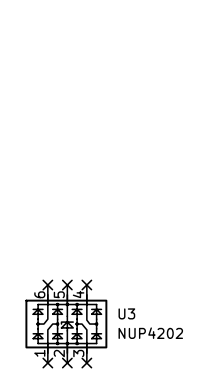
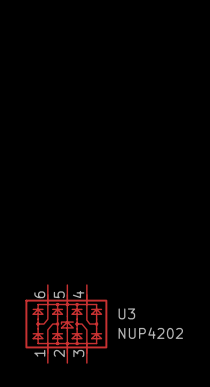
no-connect mark: (47, 285) -> none
no-connect mark: (67, 285) -> none
no-connect mark: (86, 285) -> none
no-connect mark: (47, 363) -> none
no-connect mark: (67, 363) -> none
no-connect mark: (86, 363) -> none

